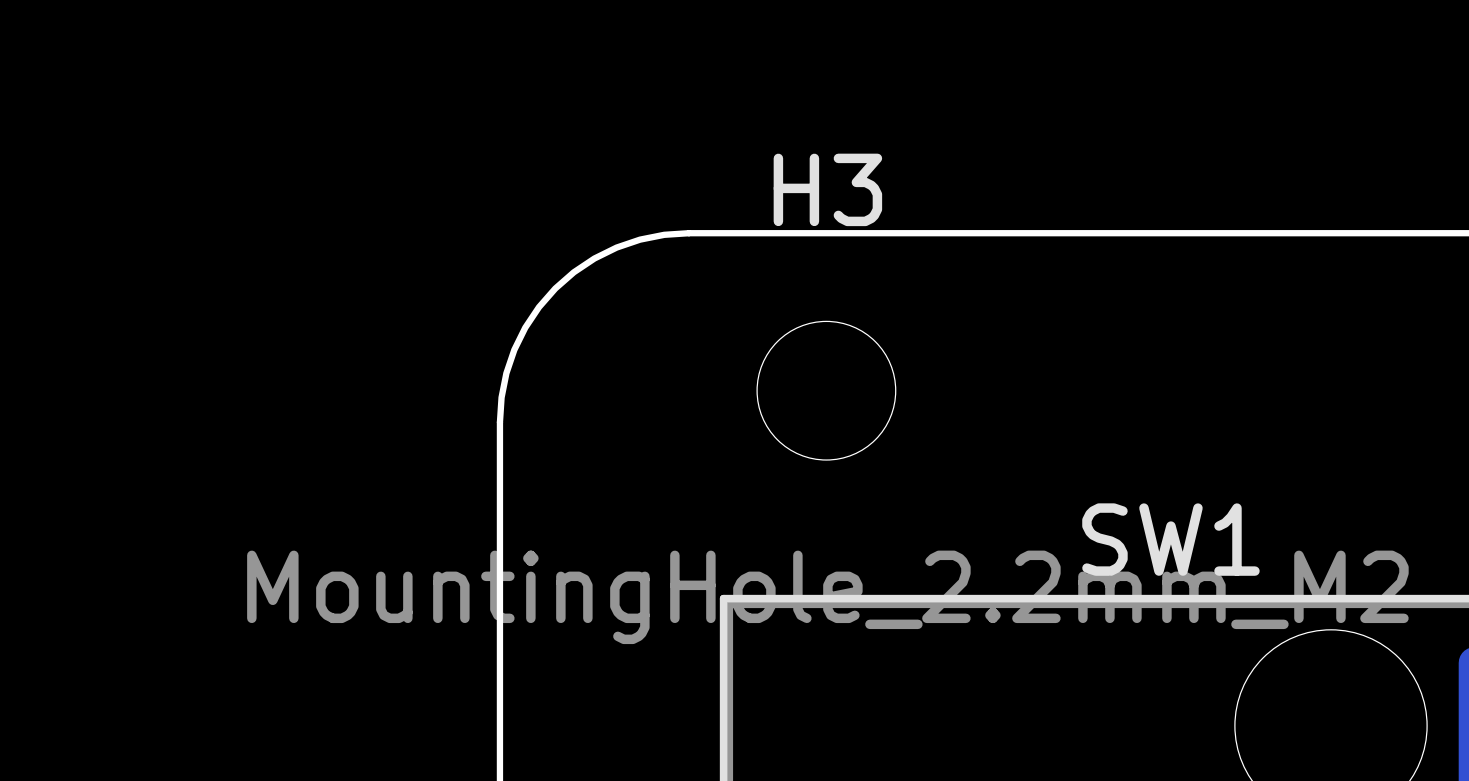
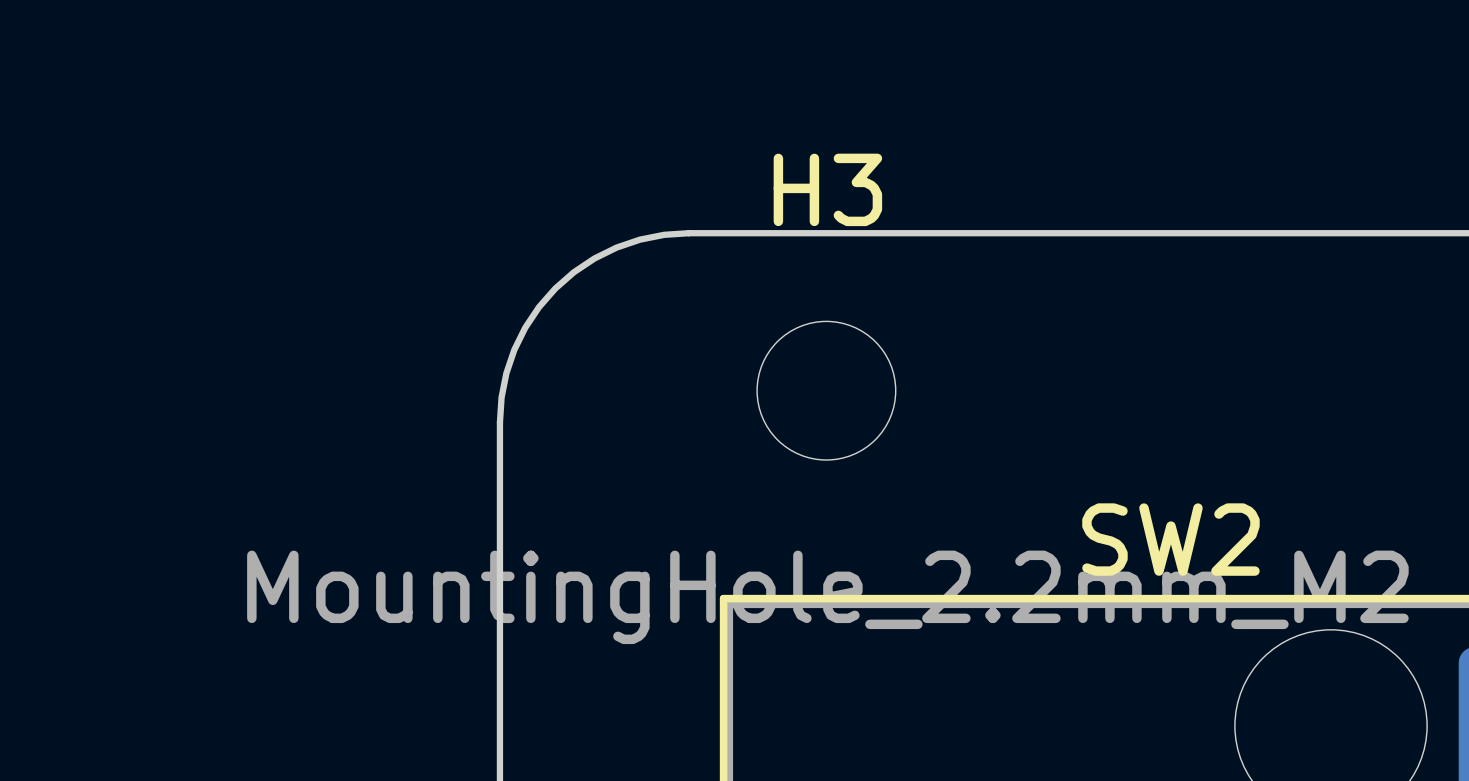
SW1 name: SW1 (1170, 539) -> SW2 (1170, 539)

